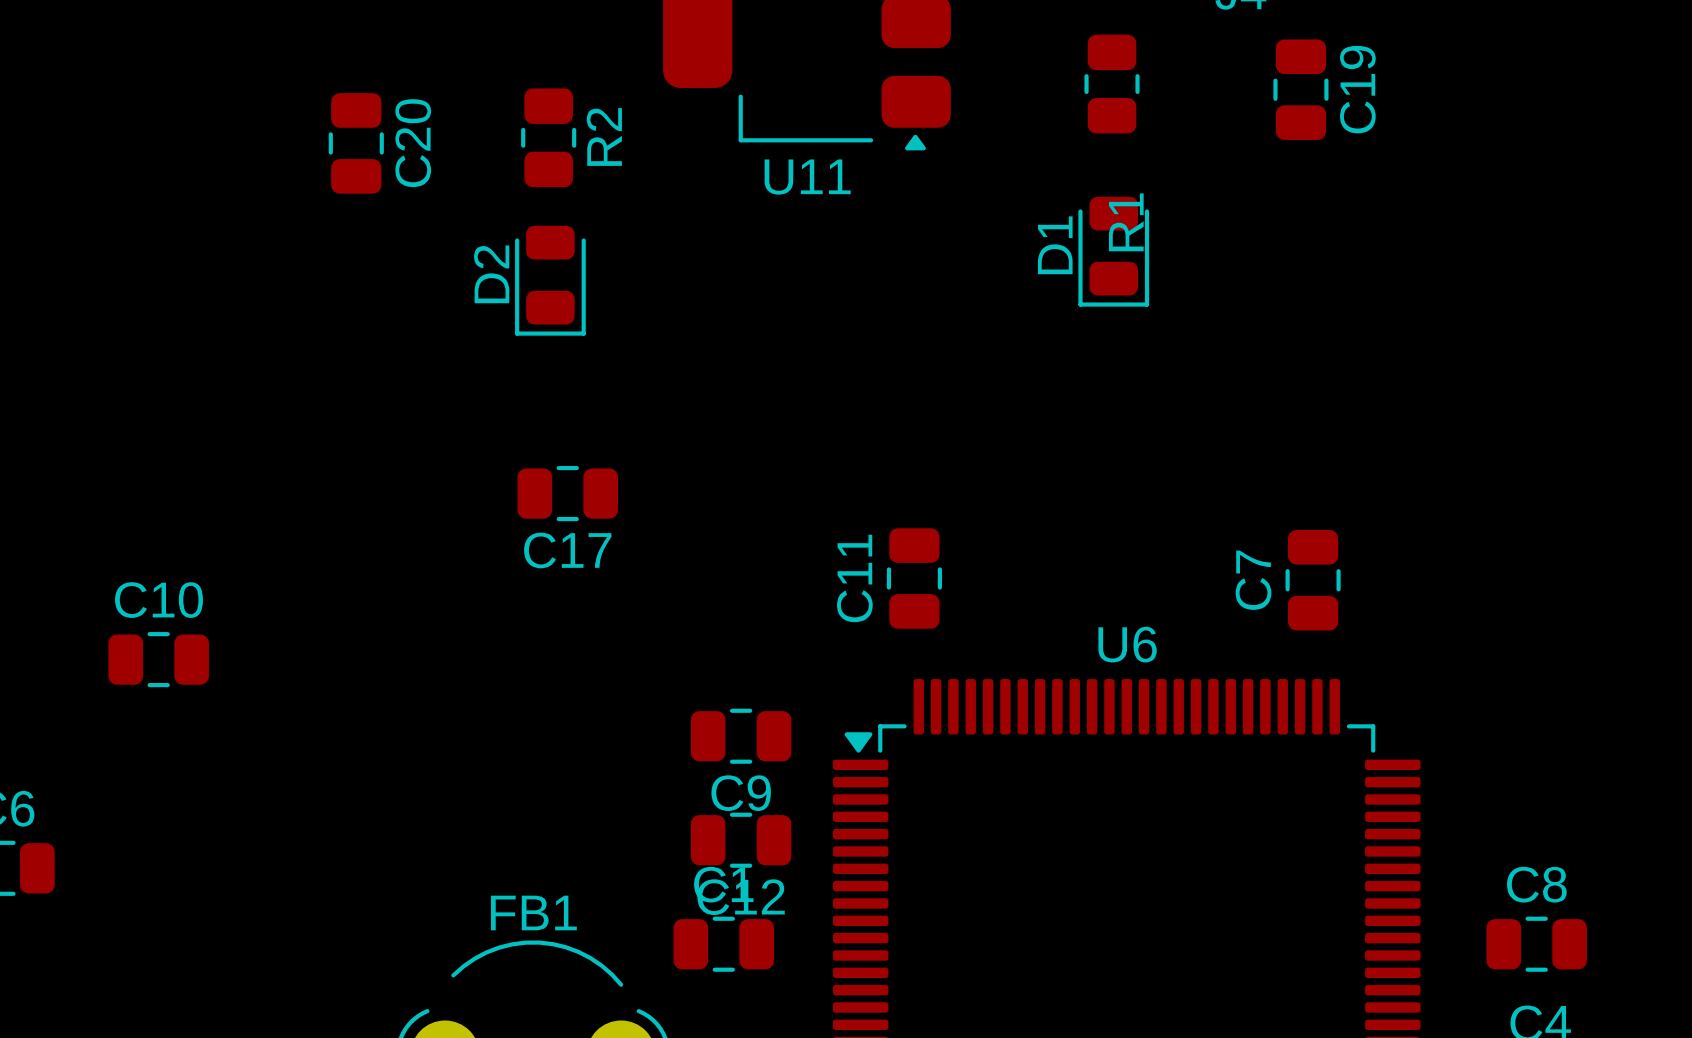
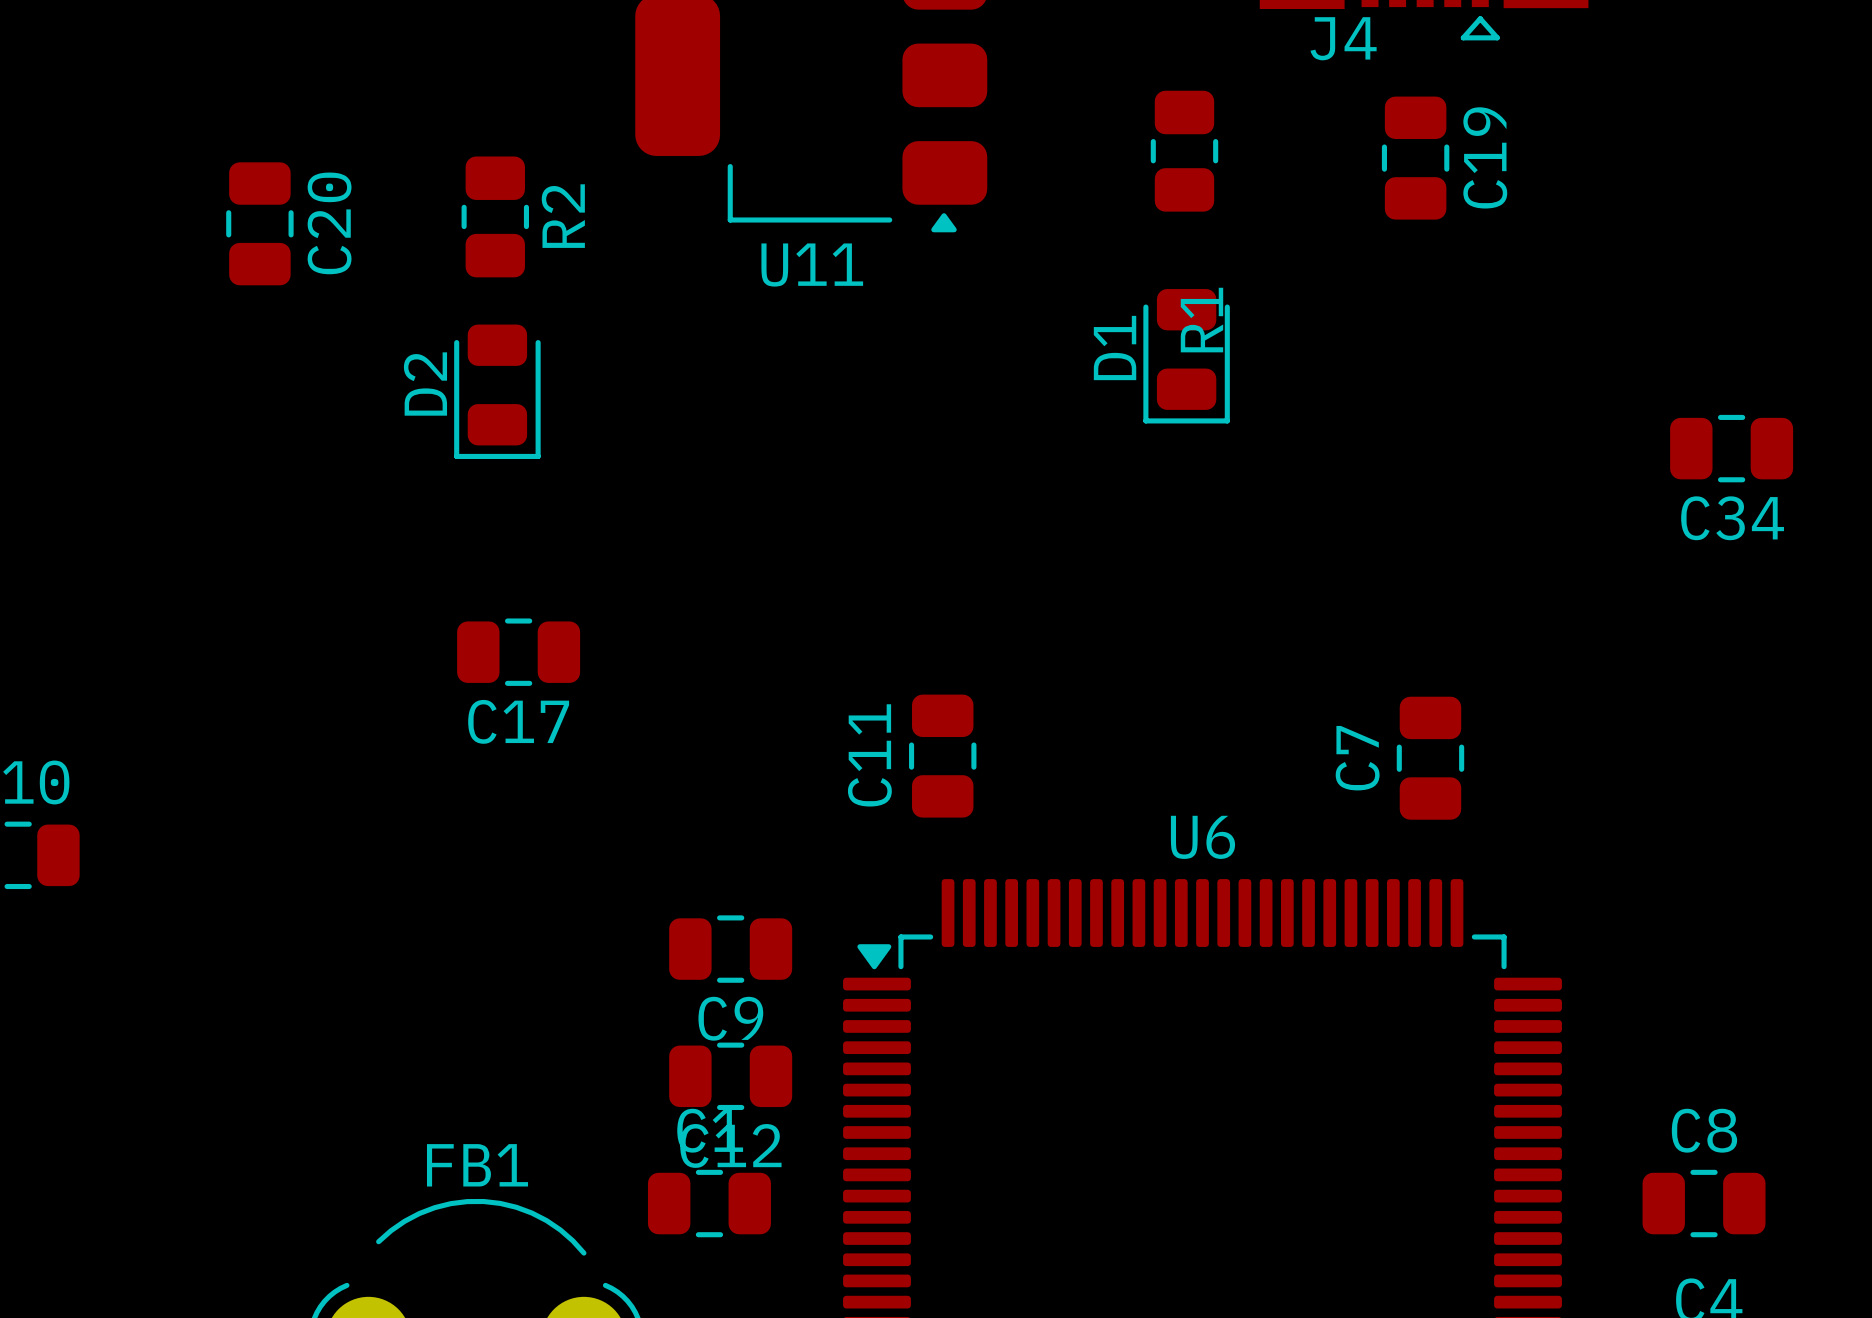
C34: none -> (1731, 448)

